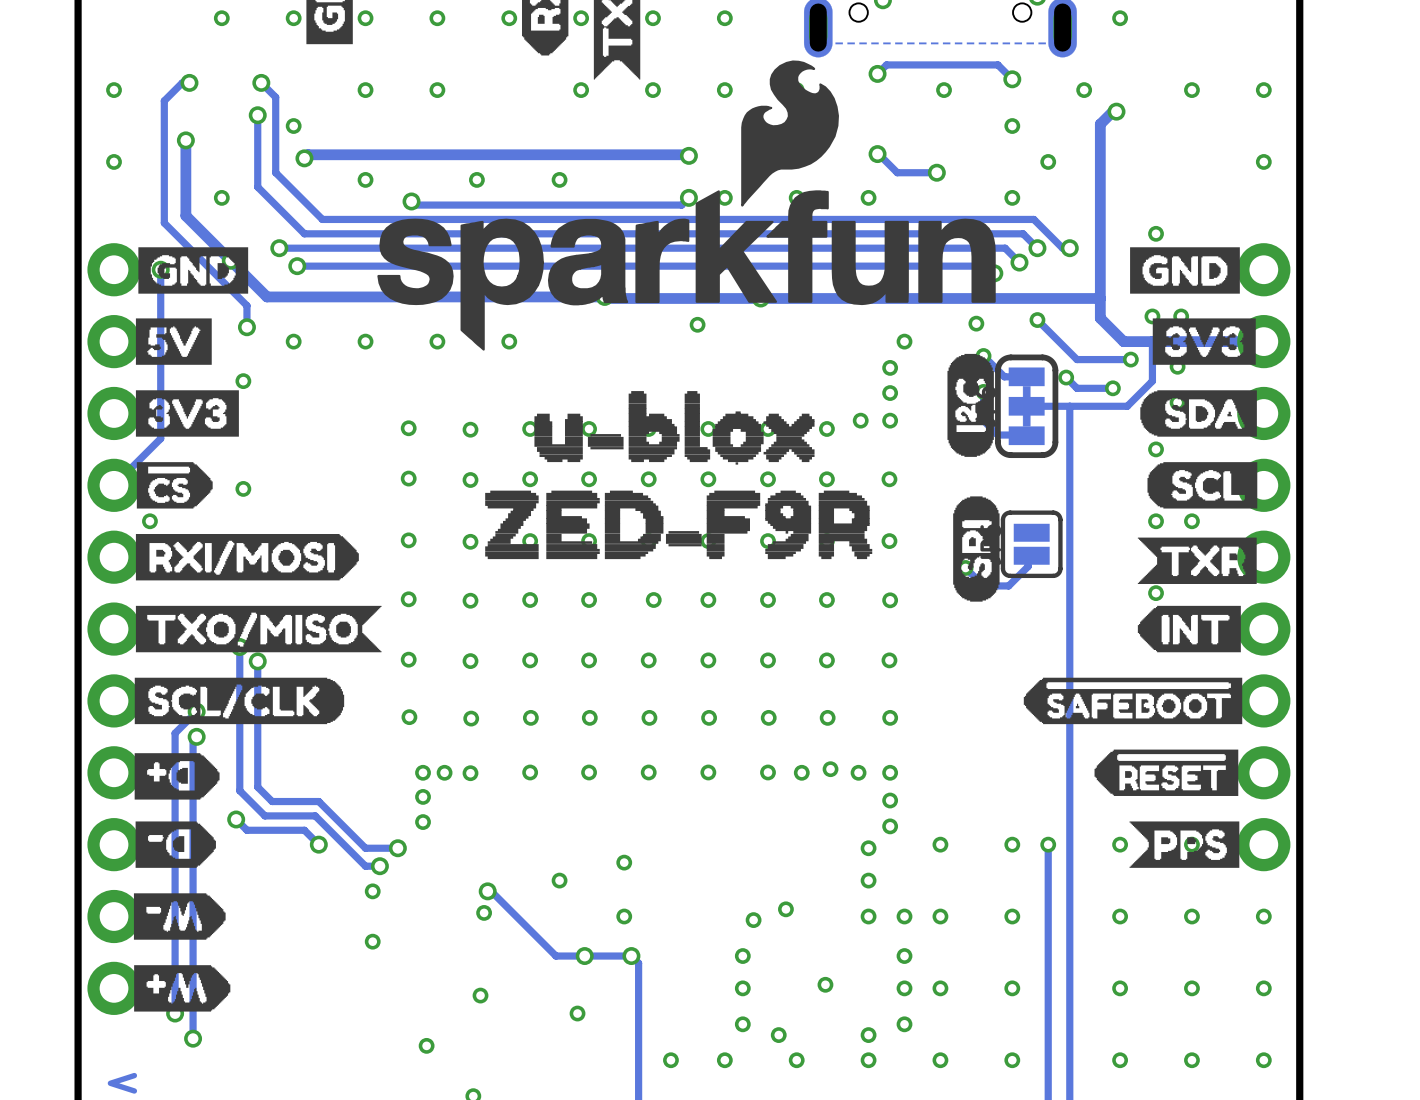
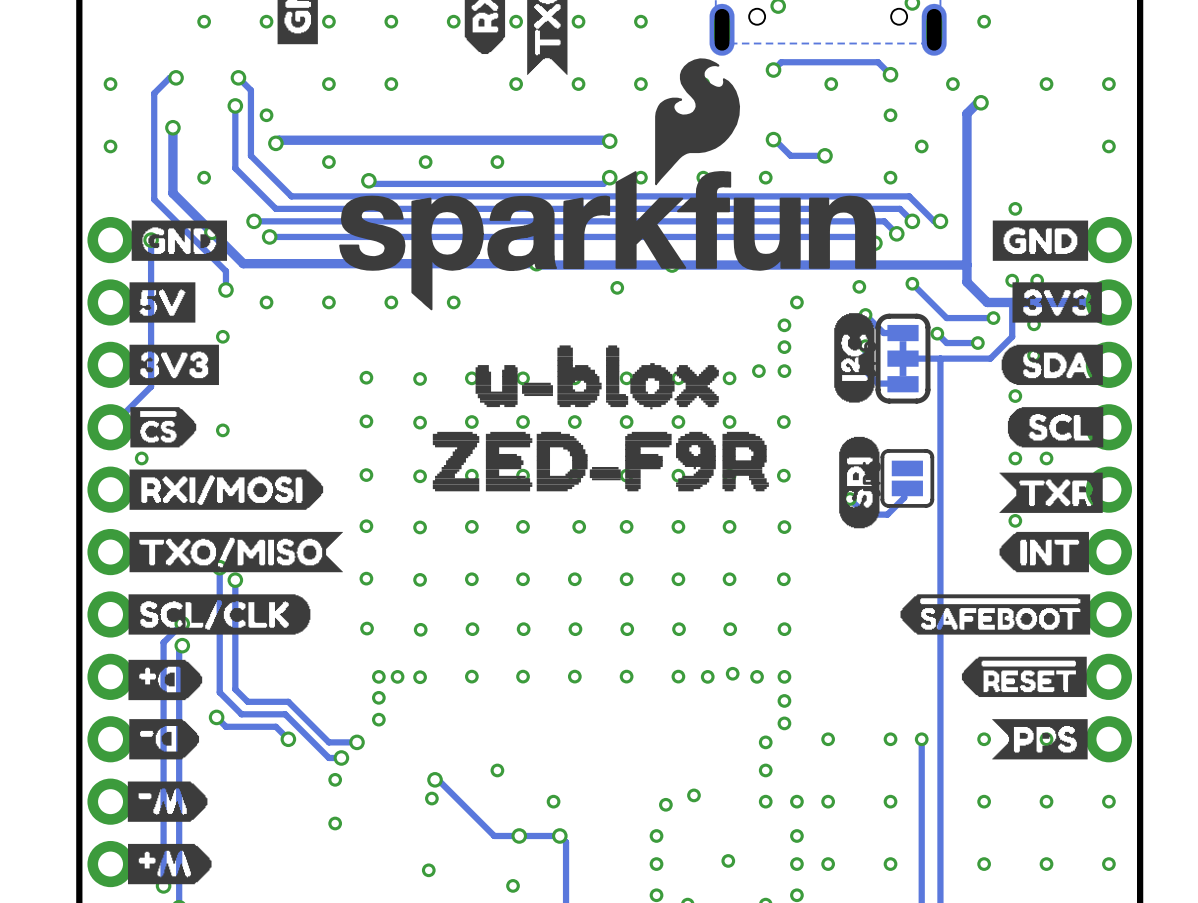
via: (624, 862) -> none

